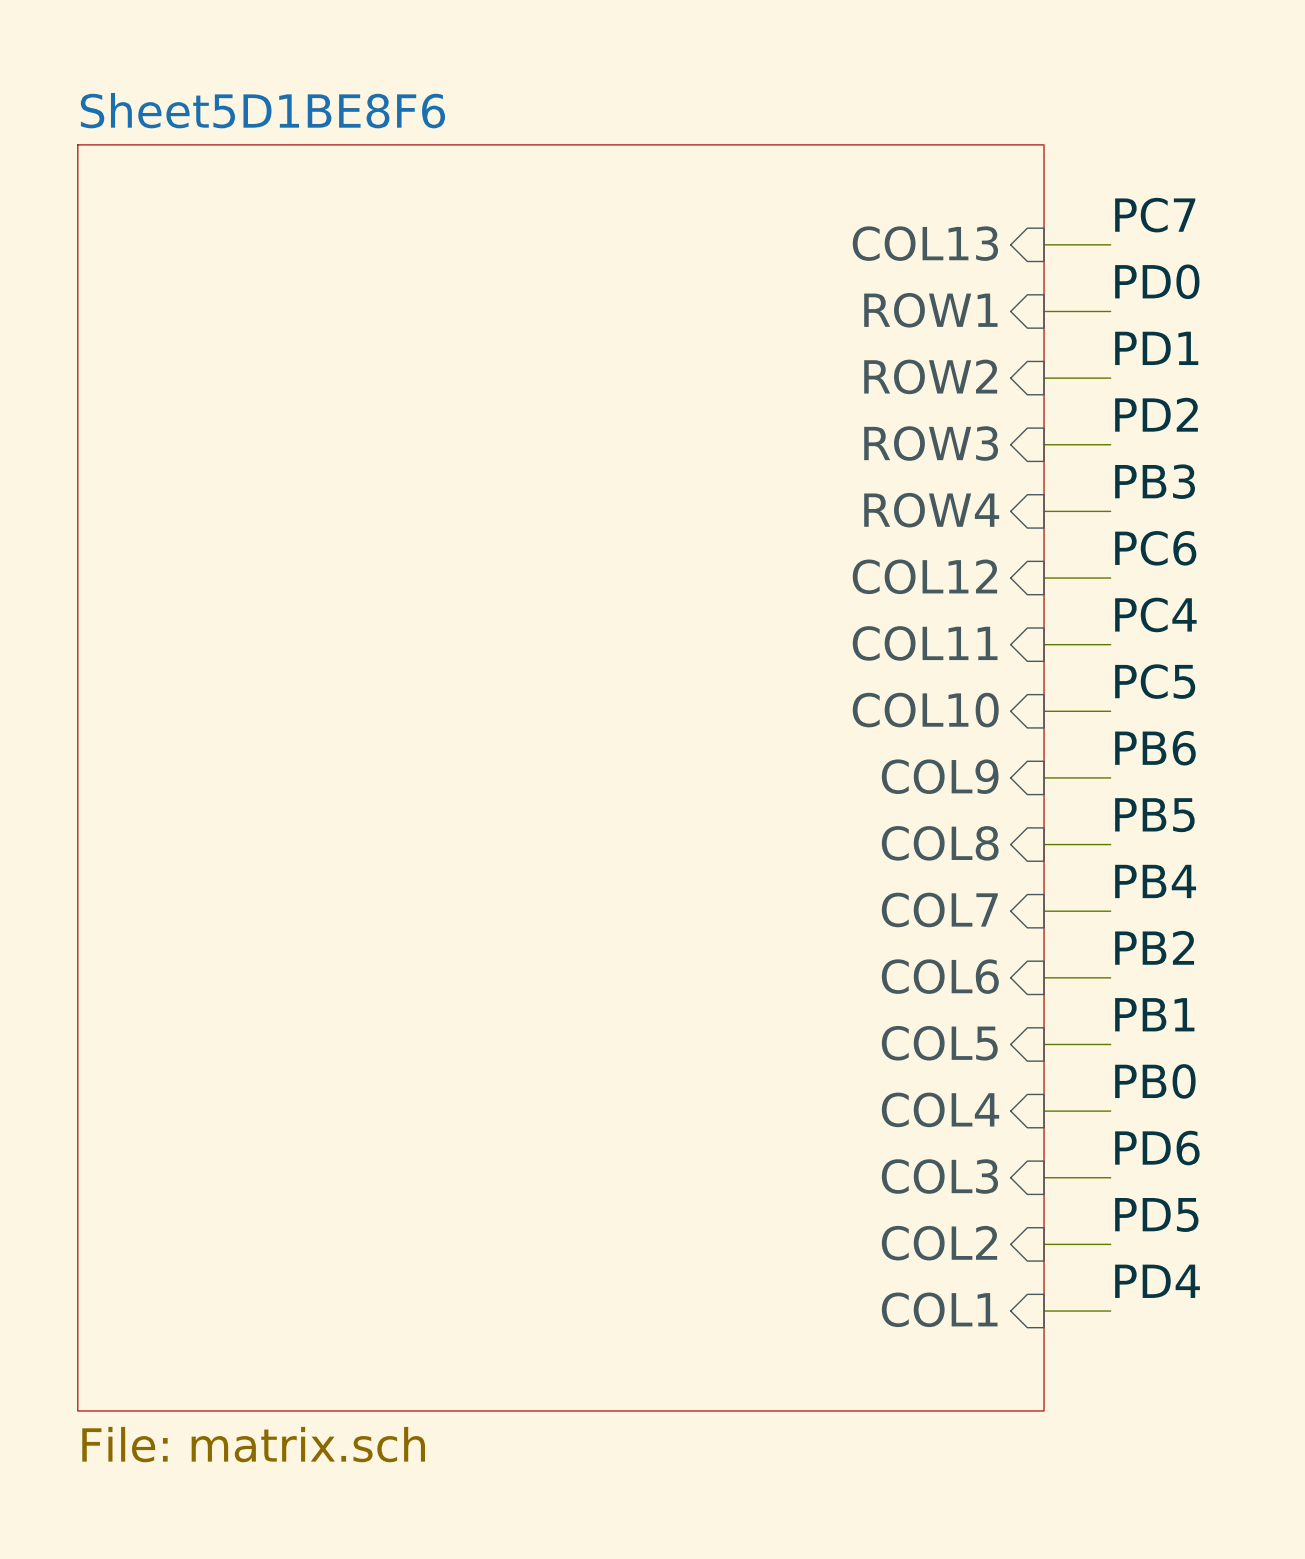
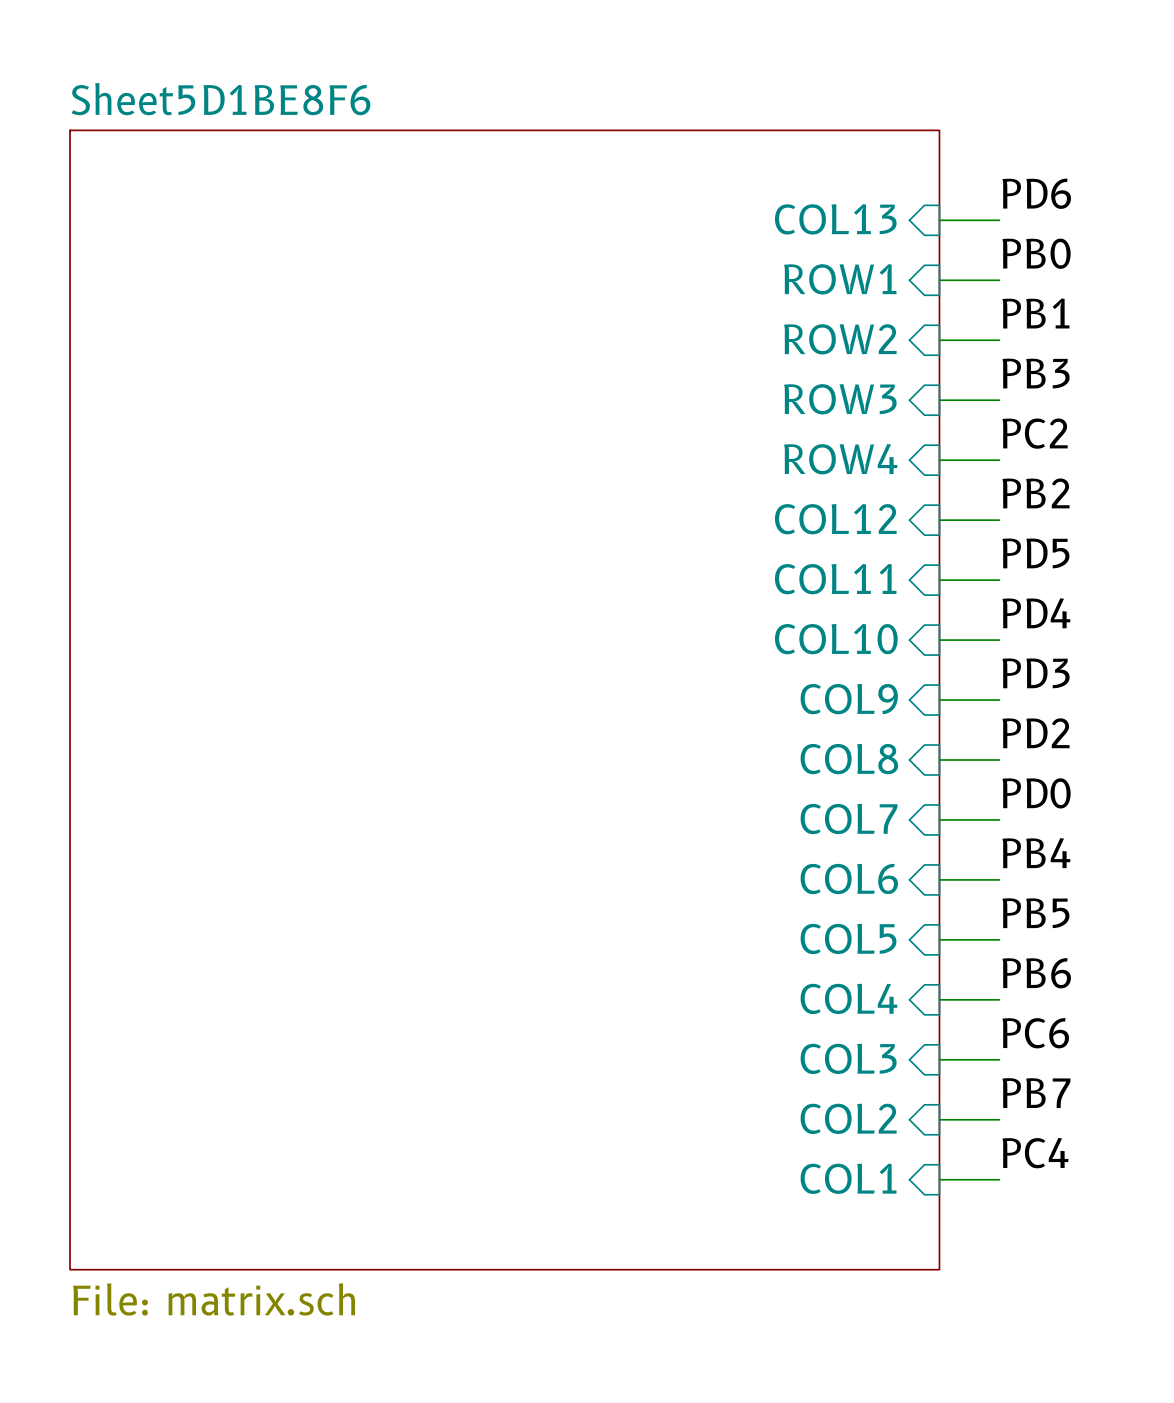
label: PC7 (1155, 215) -> PD6 (1036, 193)
label: PD0 (1157, 281) -> PB0 (1036, 253)
label: PD1 (1156, 348) -> PB1 (1035, 313)
label: PD2 (1156, 414) -> PB3 (1036, 373)
label: PB3 (1155, 481) -> PC2 (1035, 433)
label: PC6 (1155, 548) -> PB2 (1036, 493)
label: PC4 (1155, 614) -> PD5 (1035, 553)
label: PC5 (1155, 681) -> PD4 (1036, 613)
label: PB6 (1155, 748) -> PD3 (1036, 673)
label: PB5 (1154, 815) -> PD2 (1036, 733)
label: PB4 (1155, 881) -> PD0 (1036, 793)
label: PB2 (1154, 947) -> PB4 (1036, 853)
label: PB1 (1154, 1014) -> PB5 (1035, 913)
label: PB0 (1155, 1081) -> PB6 (1036, 973)
label: PD6 (1157, 1148) -> PC6 (1035, 1033)
label: PD5 (1156, 1214) -> PB7 (1036, 1093)
label: PD4 (1157, 1281) -> PC4 (1035, 1153)

